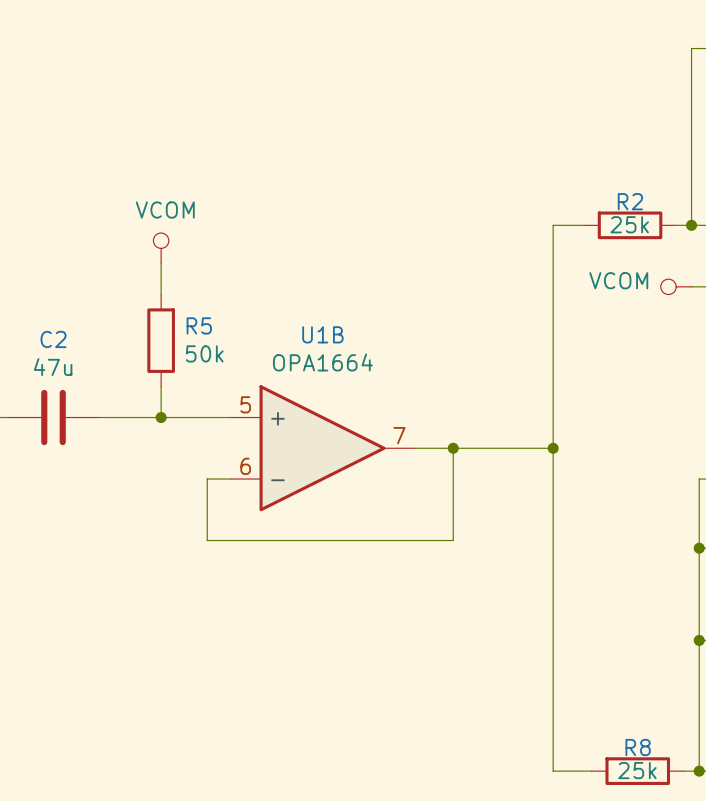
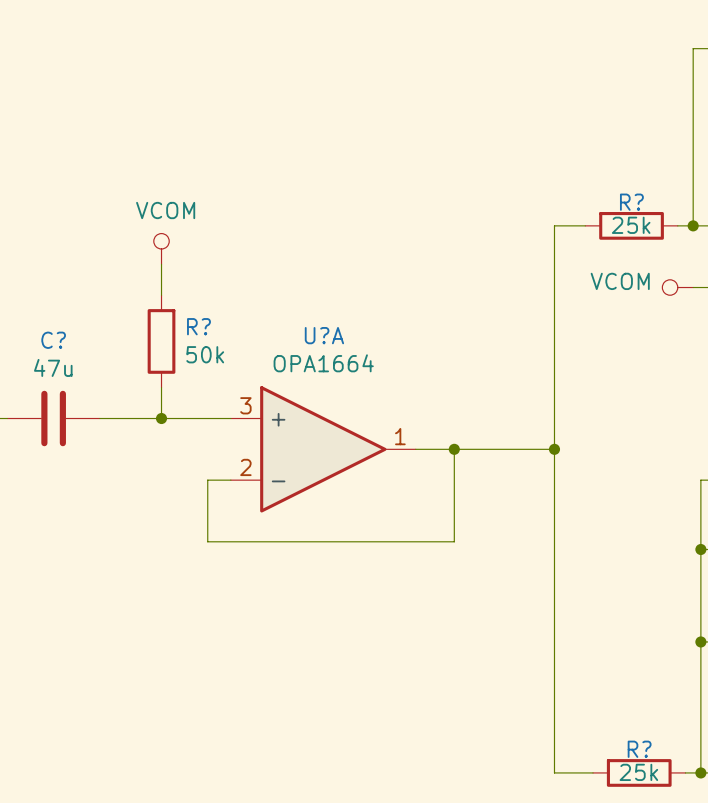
R2 name: R2 (630, 201) -> R? (631, 202)
R5 name: R5 (199, 325) -> R? (198, 326)
U1B name: U1B (322, 334) -> U?A (324, 335)
C2 name: C2 (53, 339) -> C? (53, 340)
U1B pin number: 5 (245, 404) -> 3 (245, 405)
U1B pin number: 7 (399, 435) -> 1 (400, 436)
U1B pin number: 6 (245, 466) -> 2 (245, 467)
R8 name: R8 (638, 747) -> R? (639, 749)

